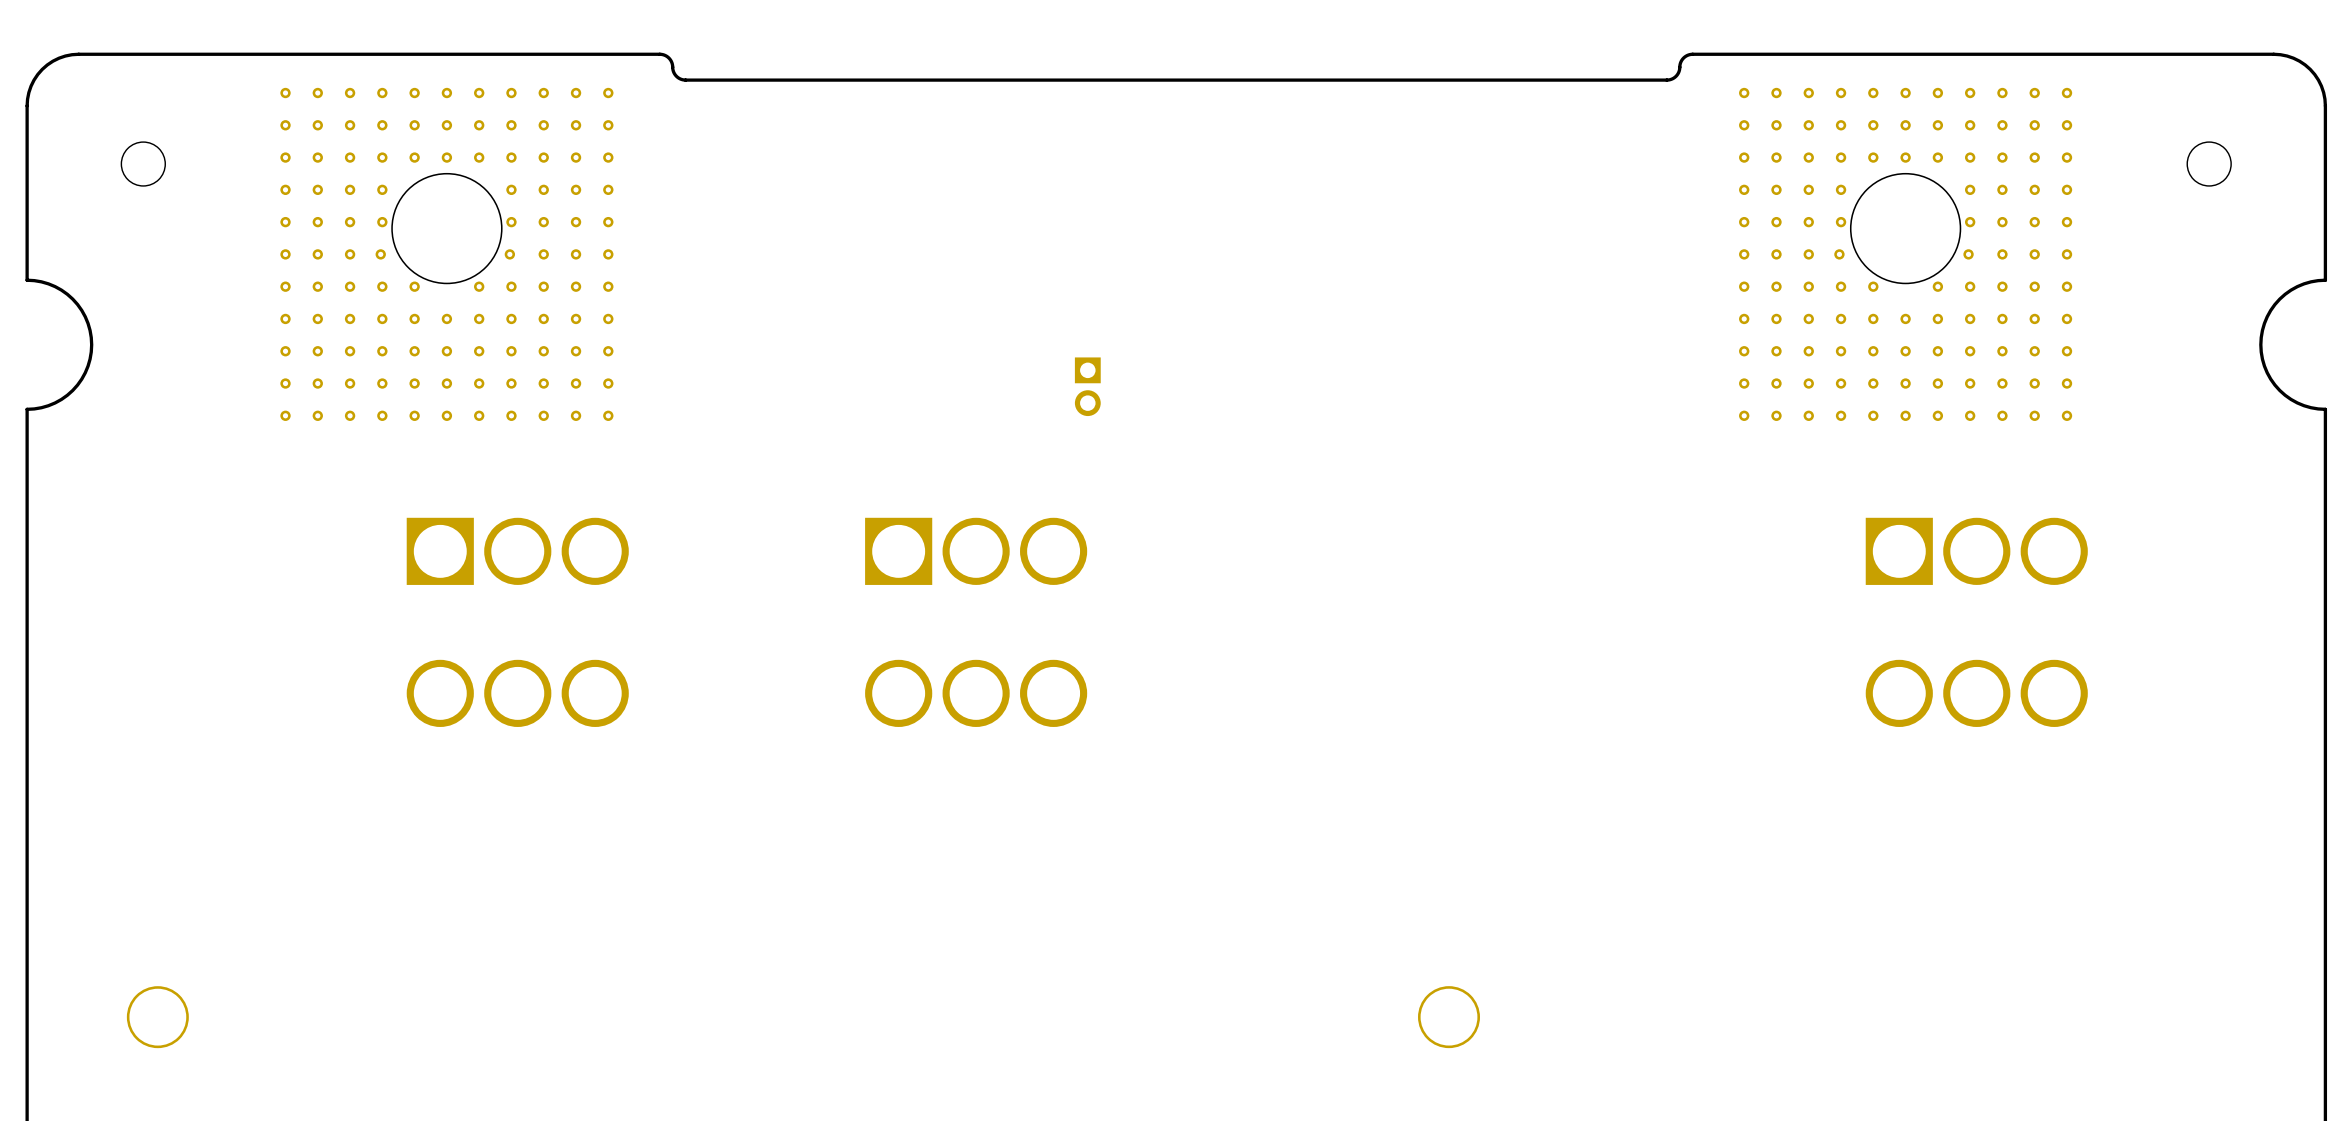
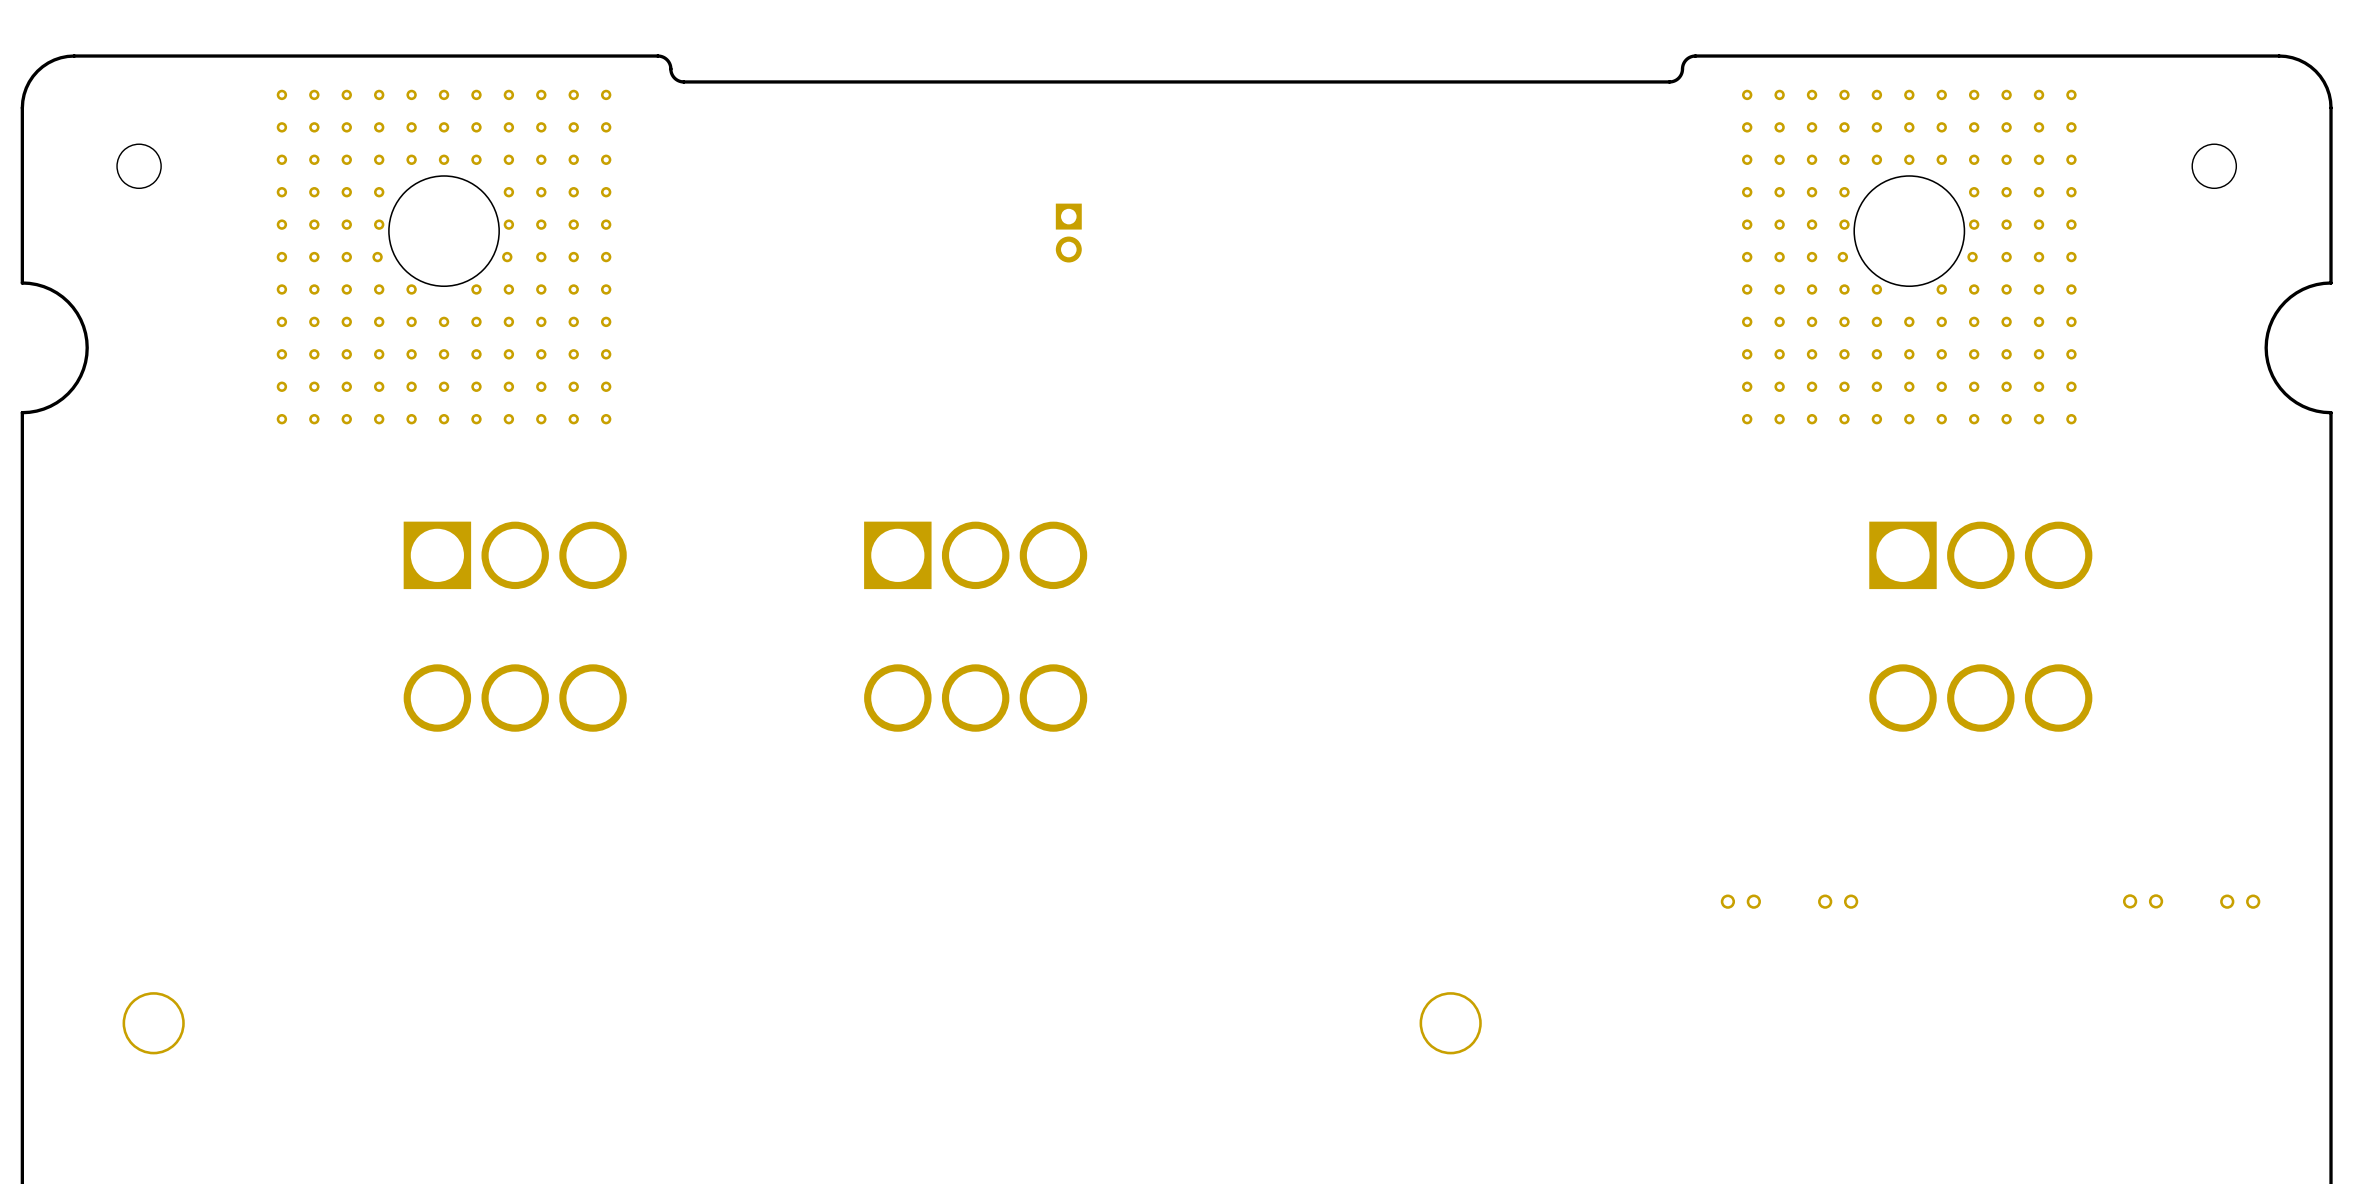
part position: (1087, 386) -> (1068, 233)
part: none -> (2143, 901)
part: none -> (1740, 901)
part: none -> (1838, 901)
part: none -> (2240, 901)

